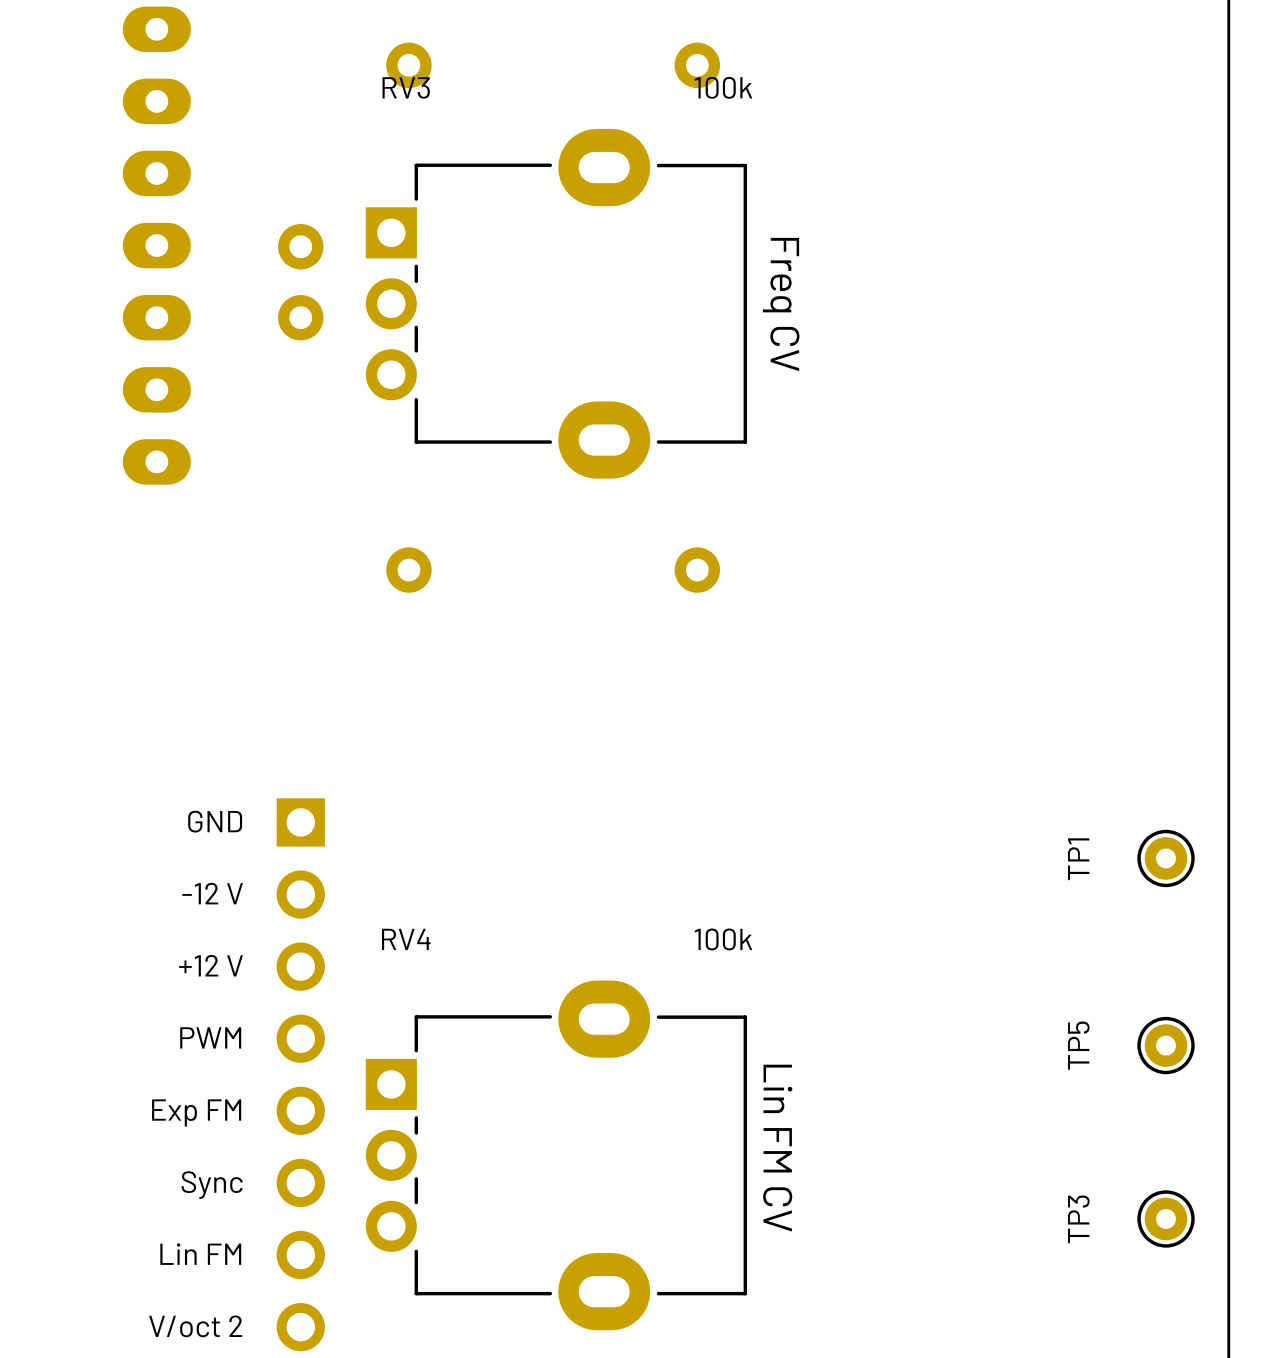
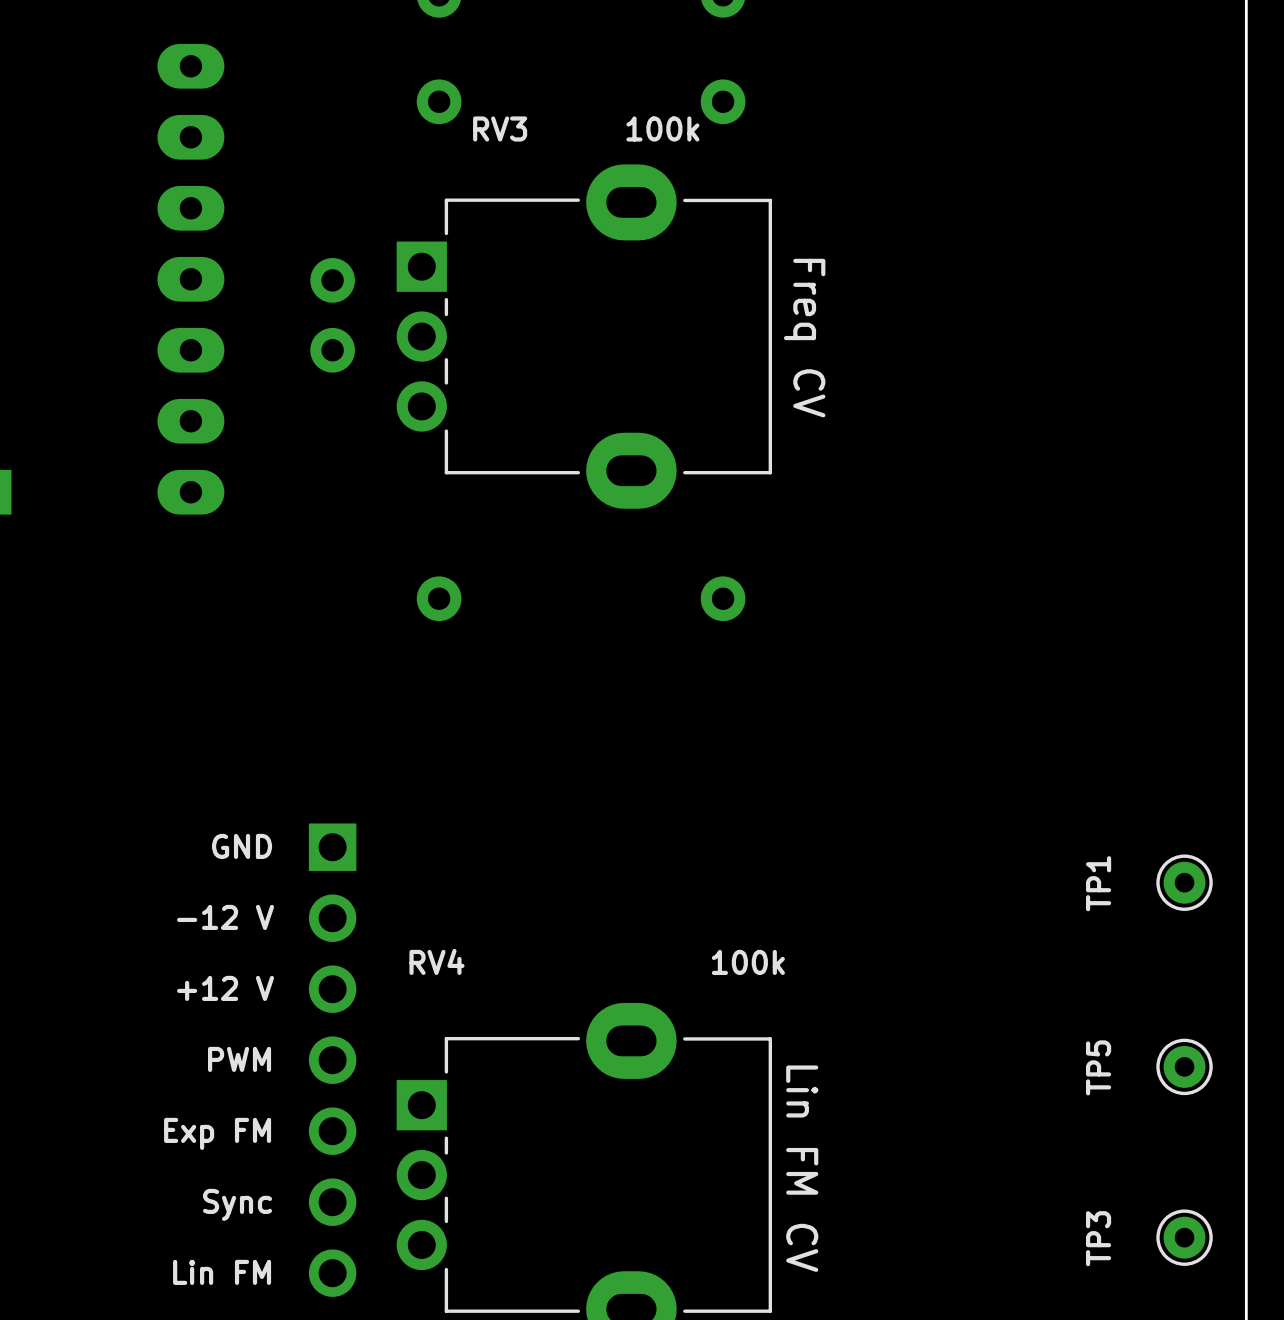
RV3 name position: RV3 (406, 87) -> RV3 (500, 128)
RV3 value position: 100k (723, 87) -> 100k (662, 128)

